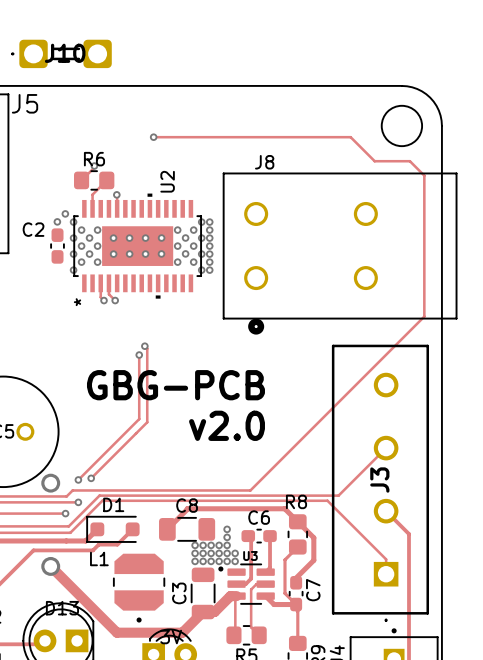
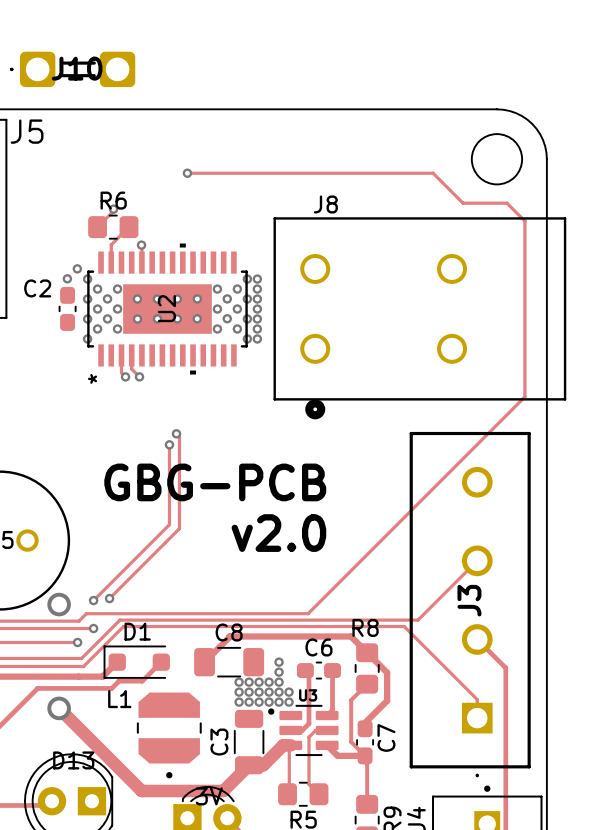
U2 name position: U2 (167, 181) -> U2 (166, 308)

